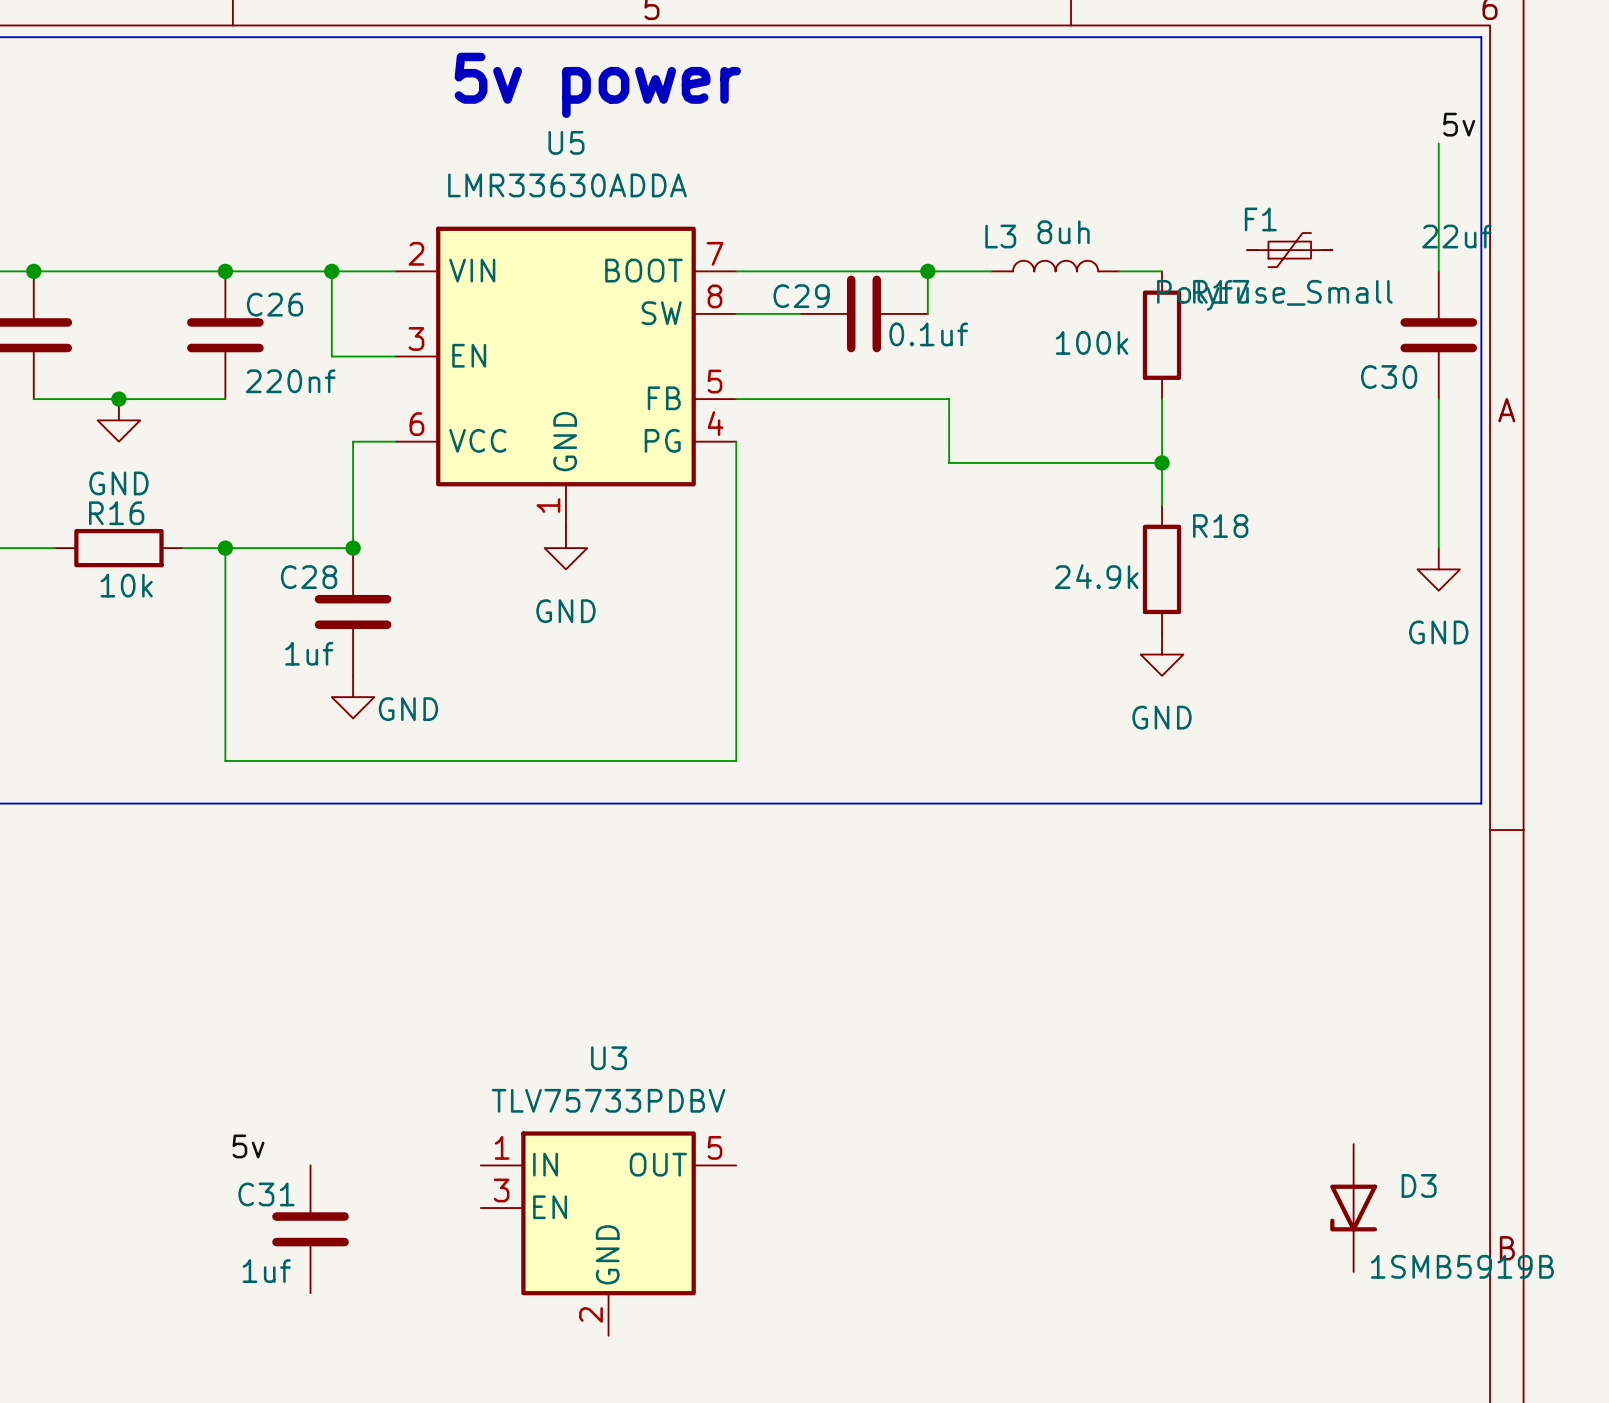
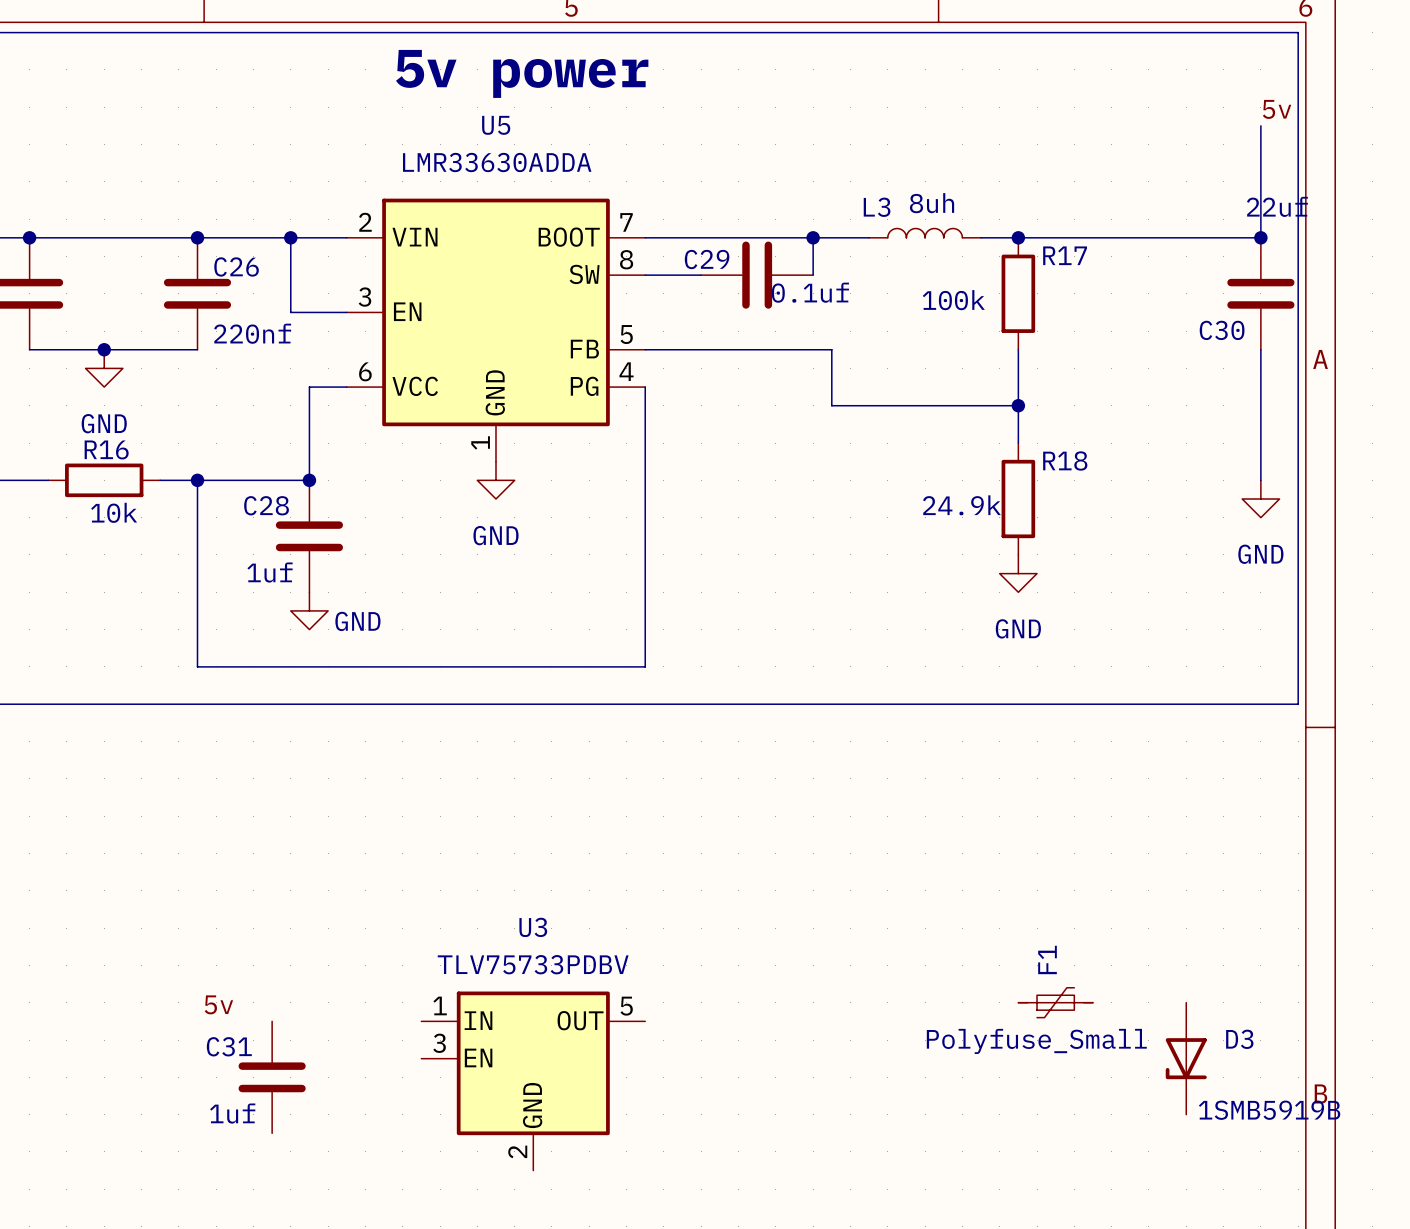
F1 name rotation: 0° (1260, 219) -> 90° counterclockwise (1047, 959)
F1 position: (1289, 250) -> (1055, 1002)
wire: none -> (1018, 237) (1260, 237)
junction: none -> (1018, 237)
junction: none -> (1260, 237)

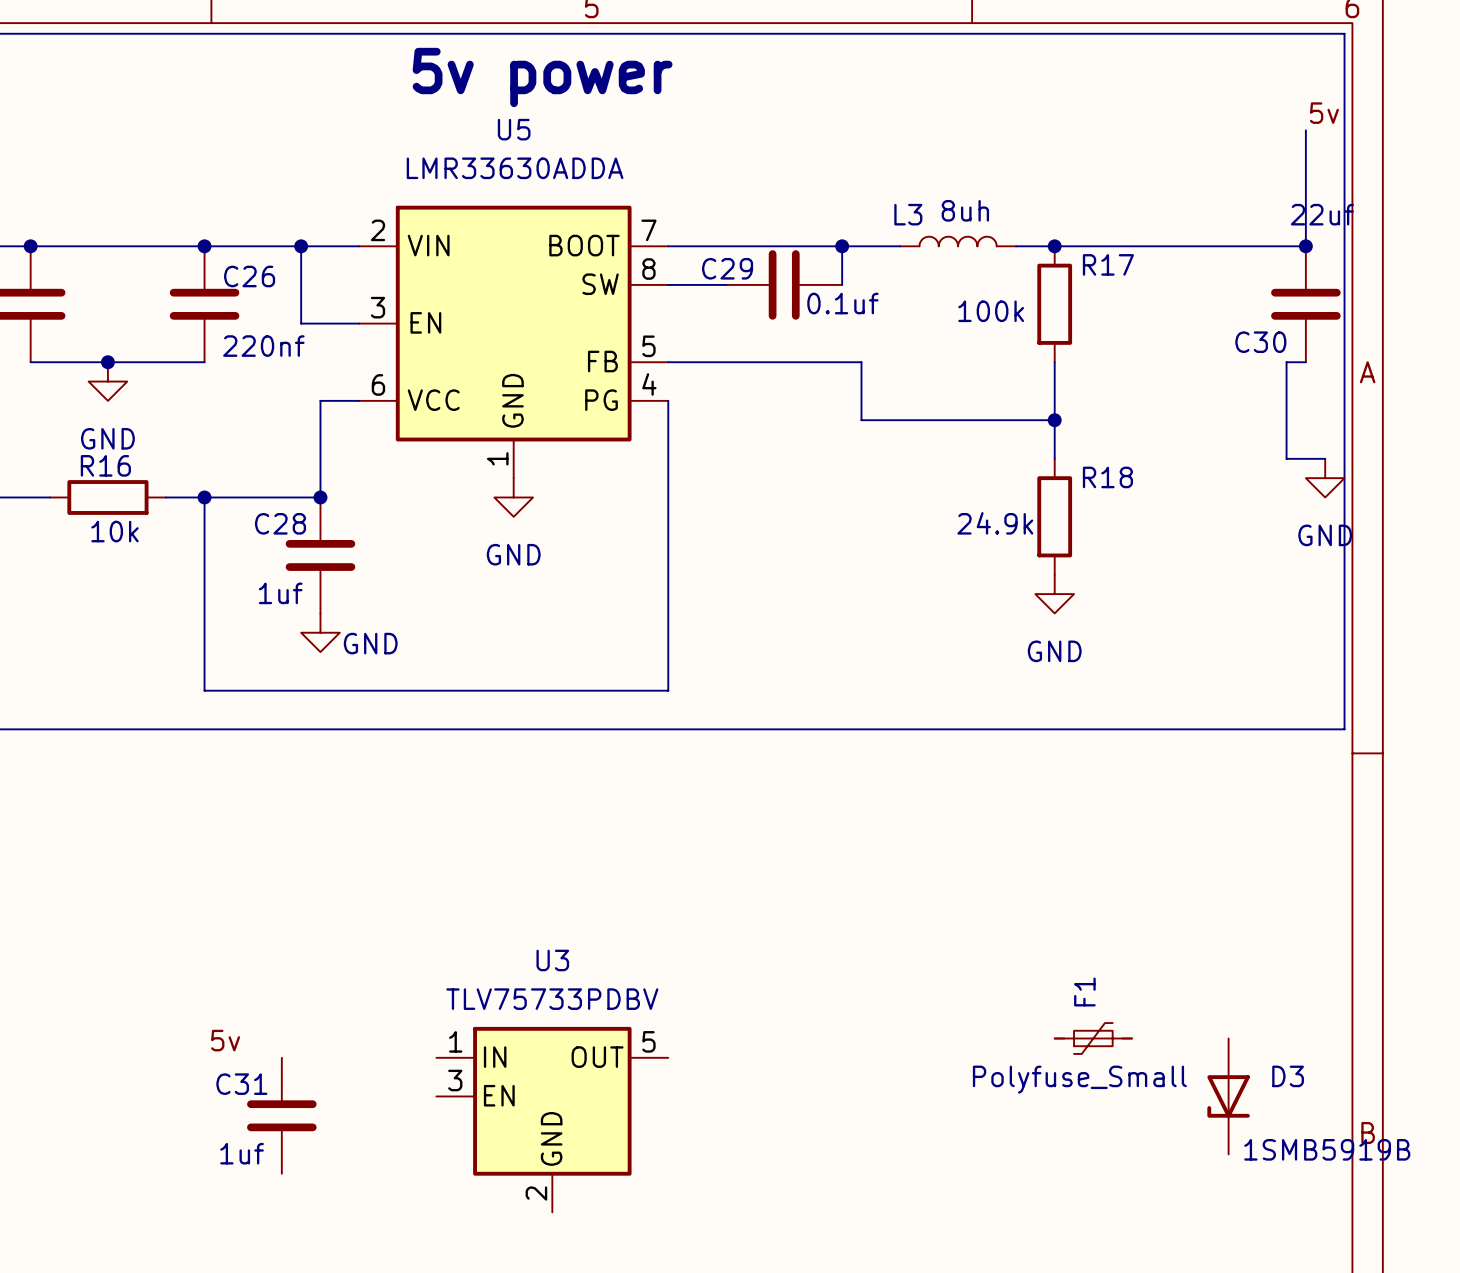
wire: (1260, 349) (1260, 480) -> (1305, 362) (1286, 362) (1286, 458) (1325, 458)
power symbol position: GND (1260, 499) -> GND (1325, 478)

